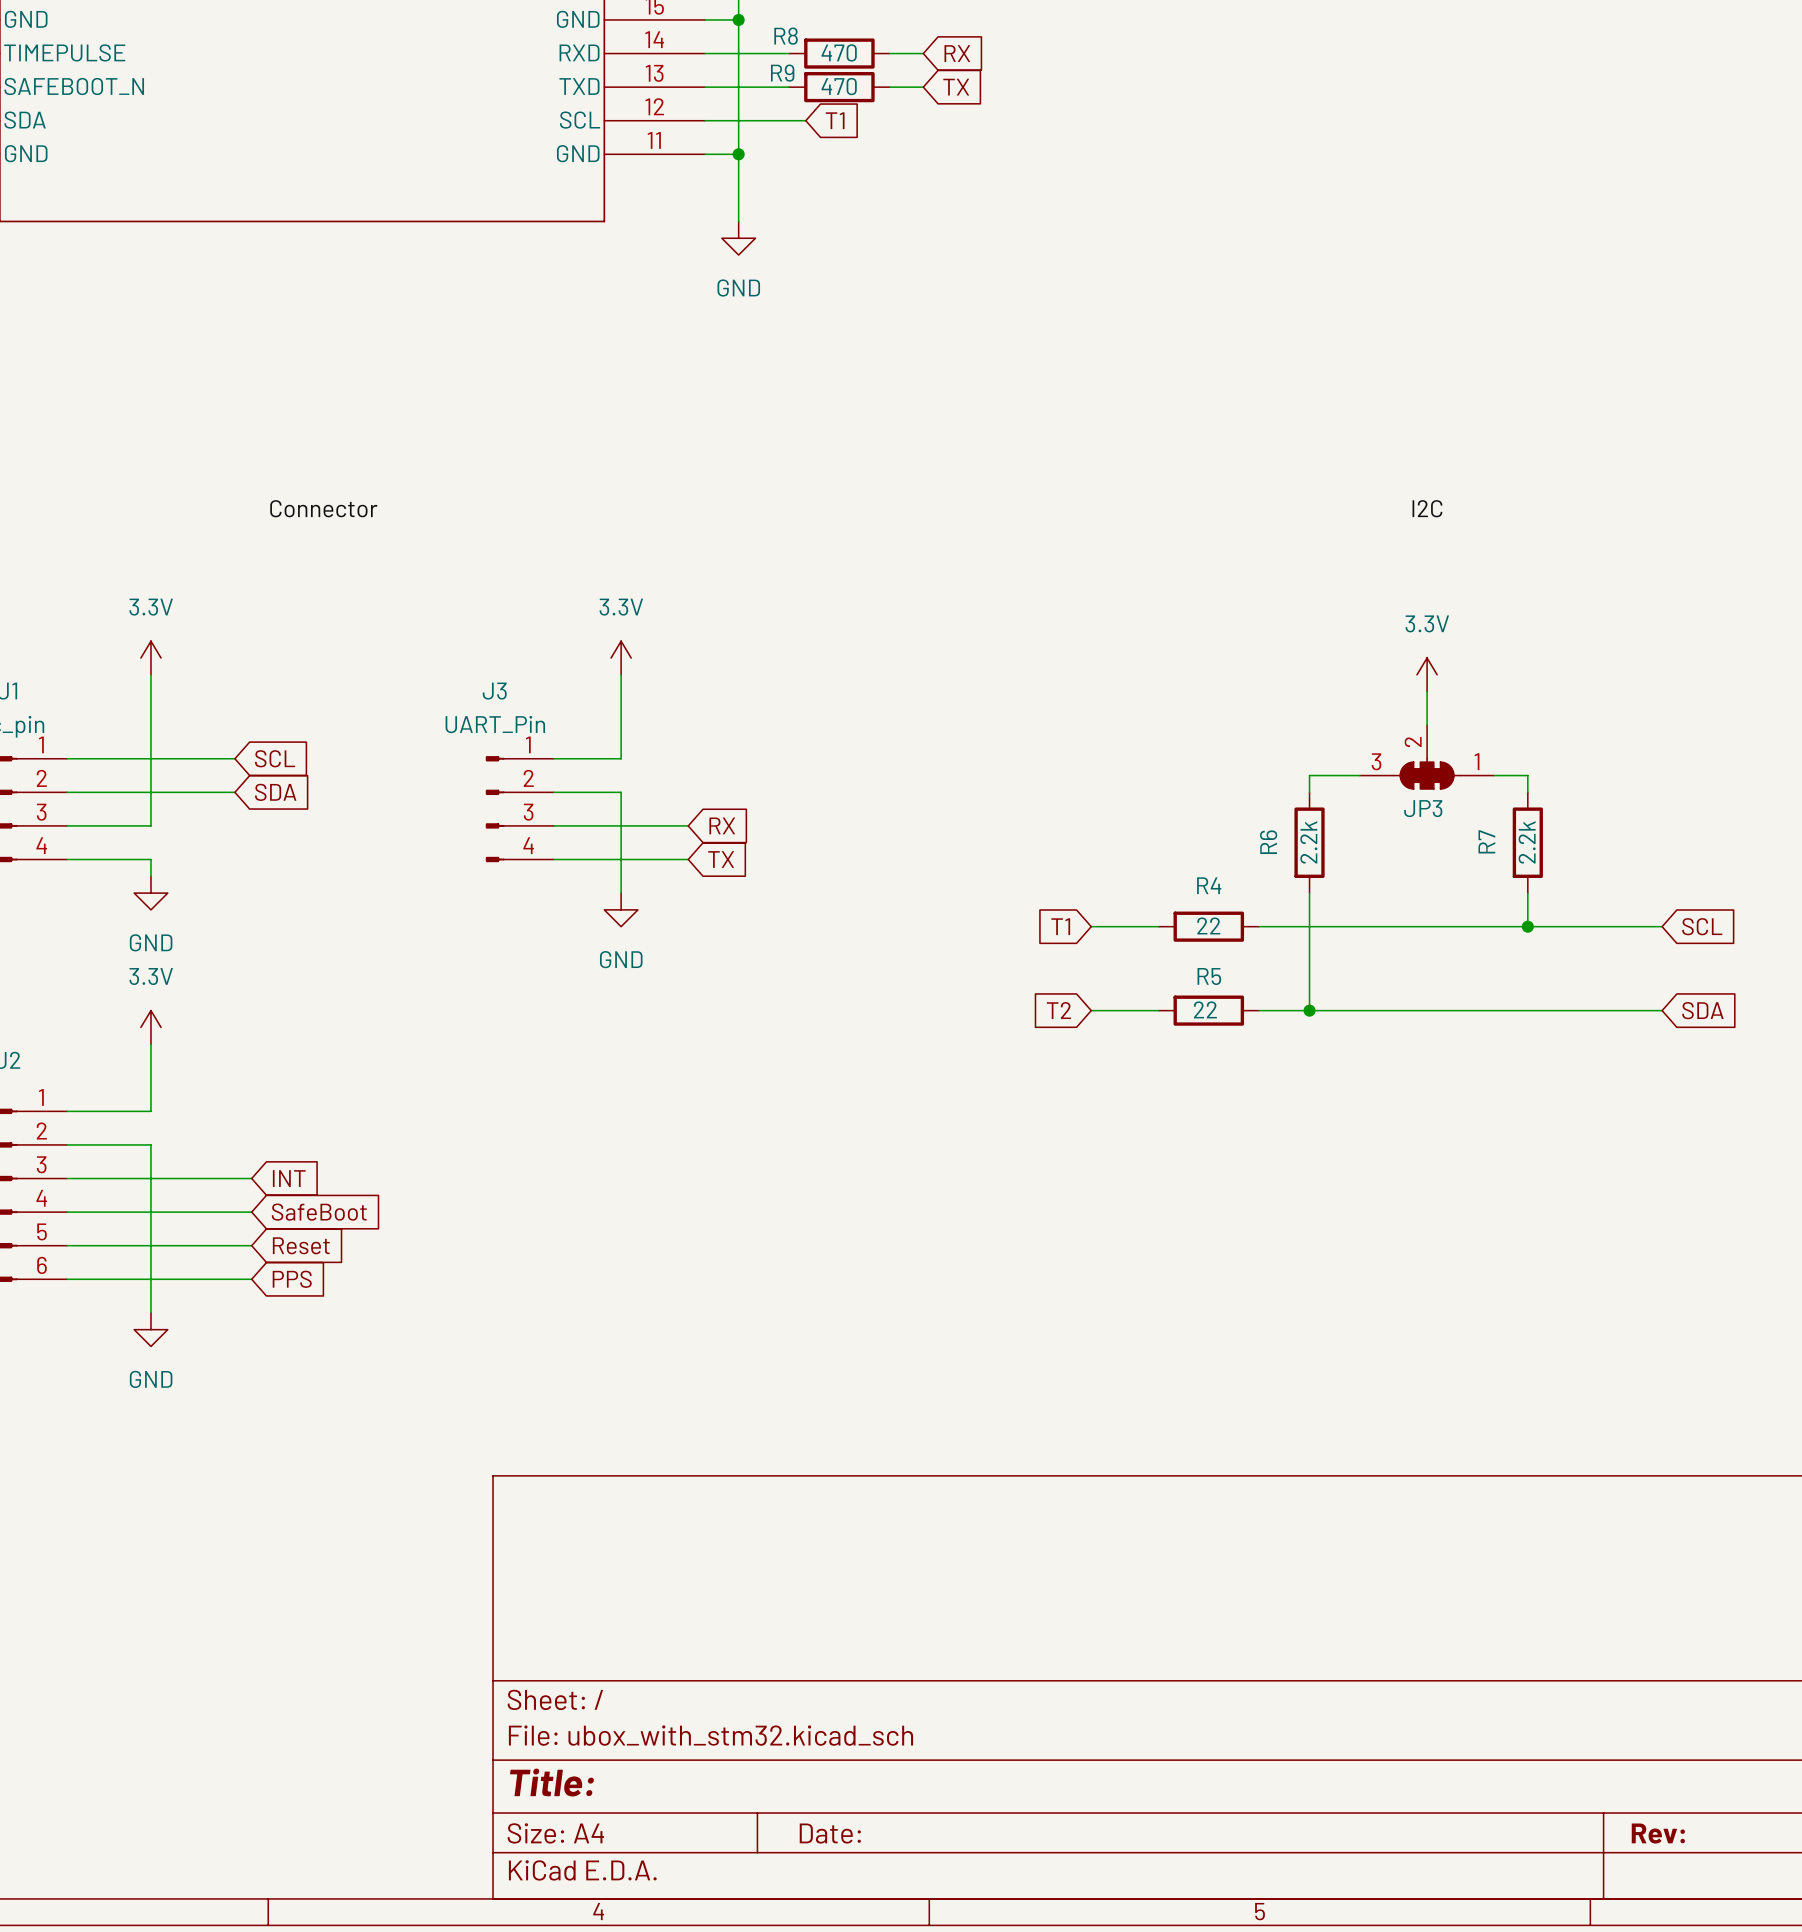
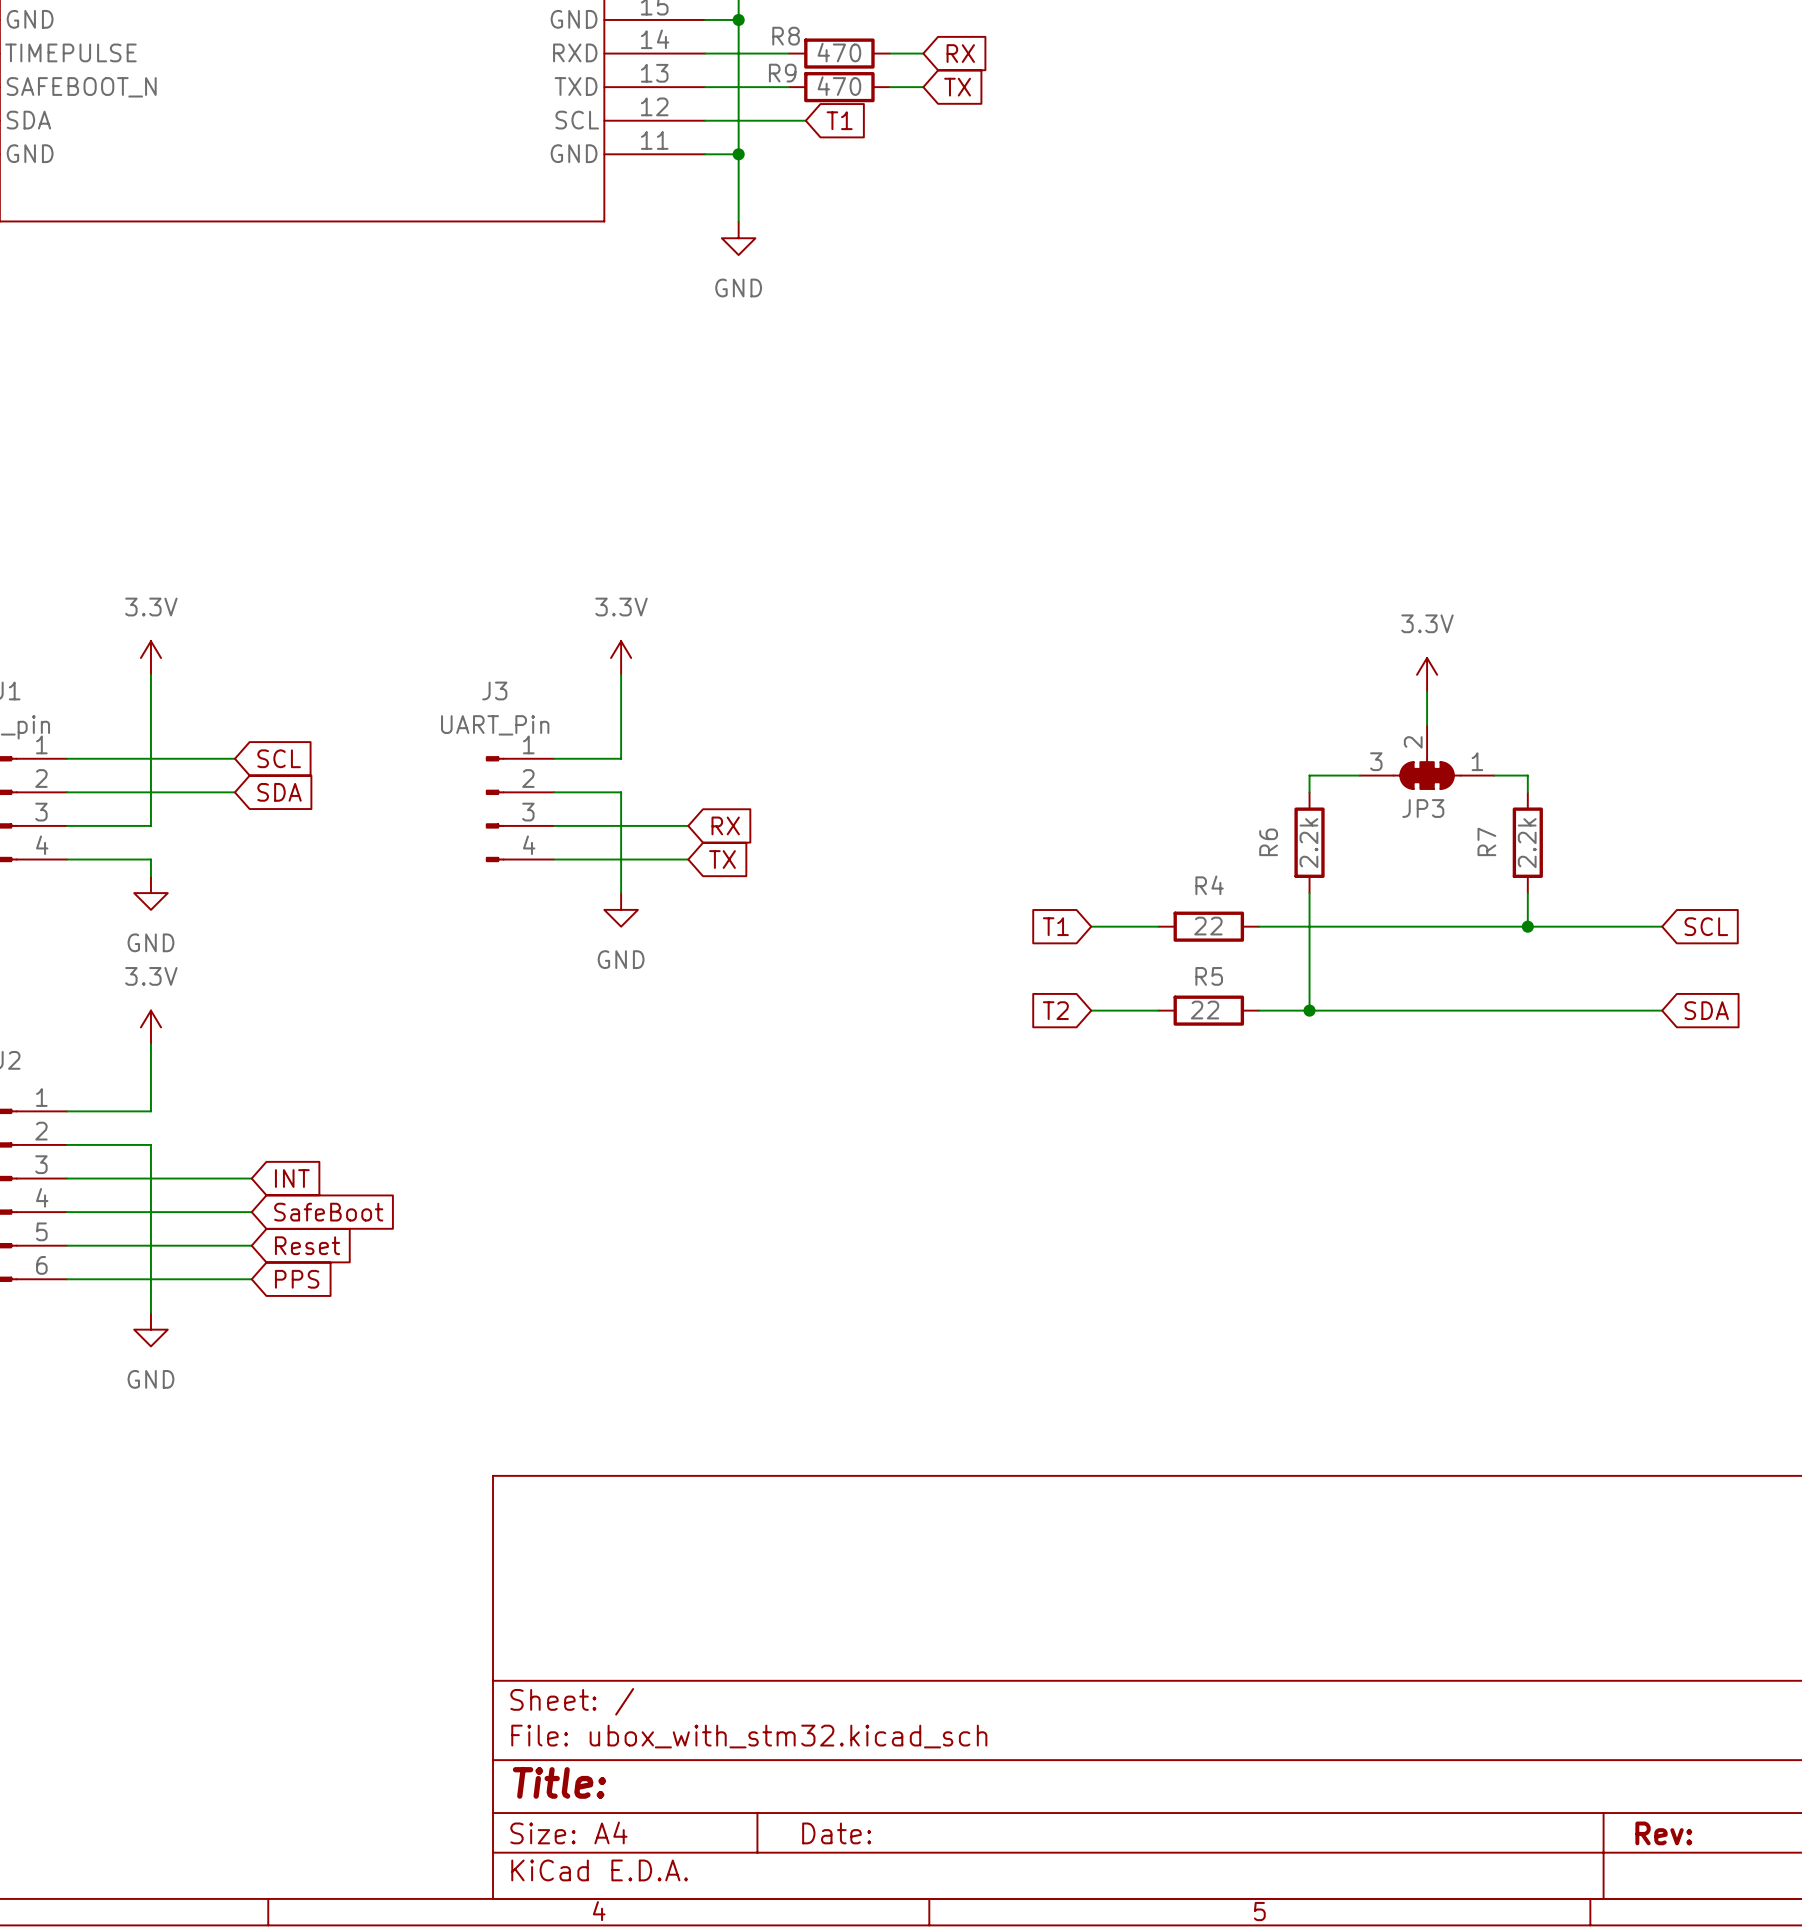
label: Connector (323, 508) -> none
label: I2C (1427, 508) -> none

